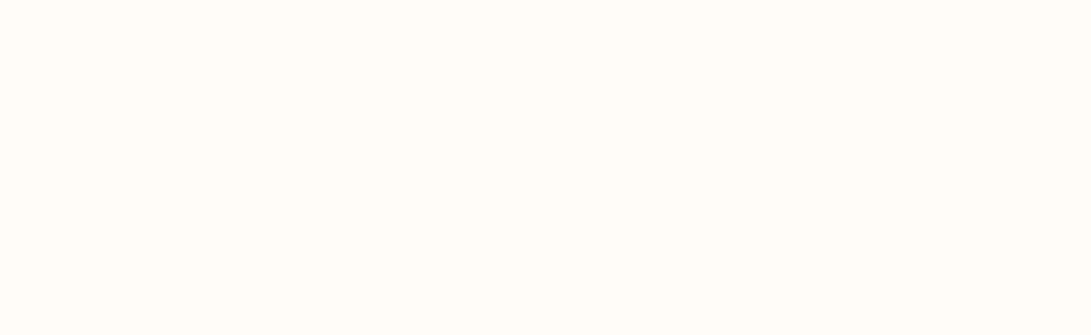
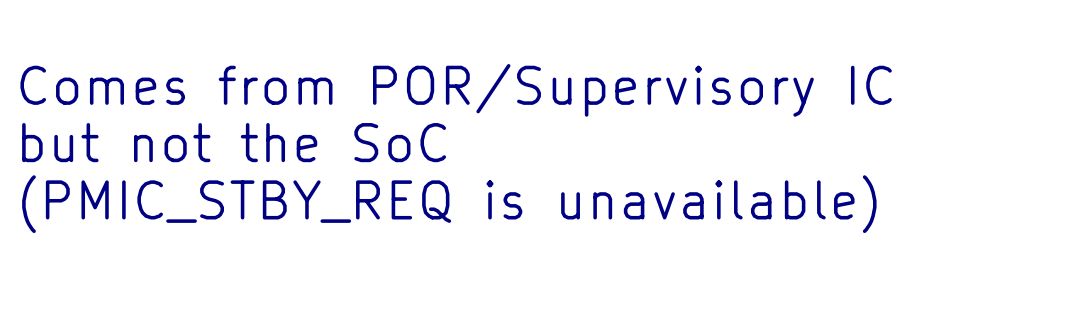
text: none -> Comes from POR/Supervisory IC (456, 90)
text: none -> but not the SoC (234, 142)
text: none -> (PMIC_STBY_REQ is unavailable) (449, 204)

